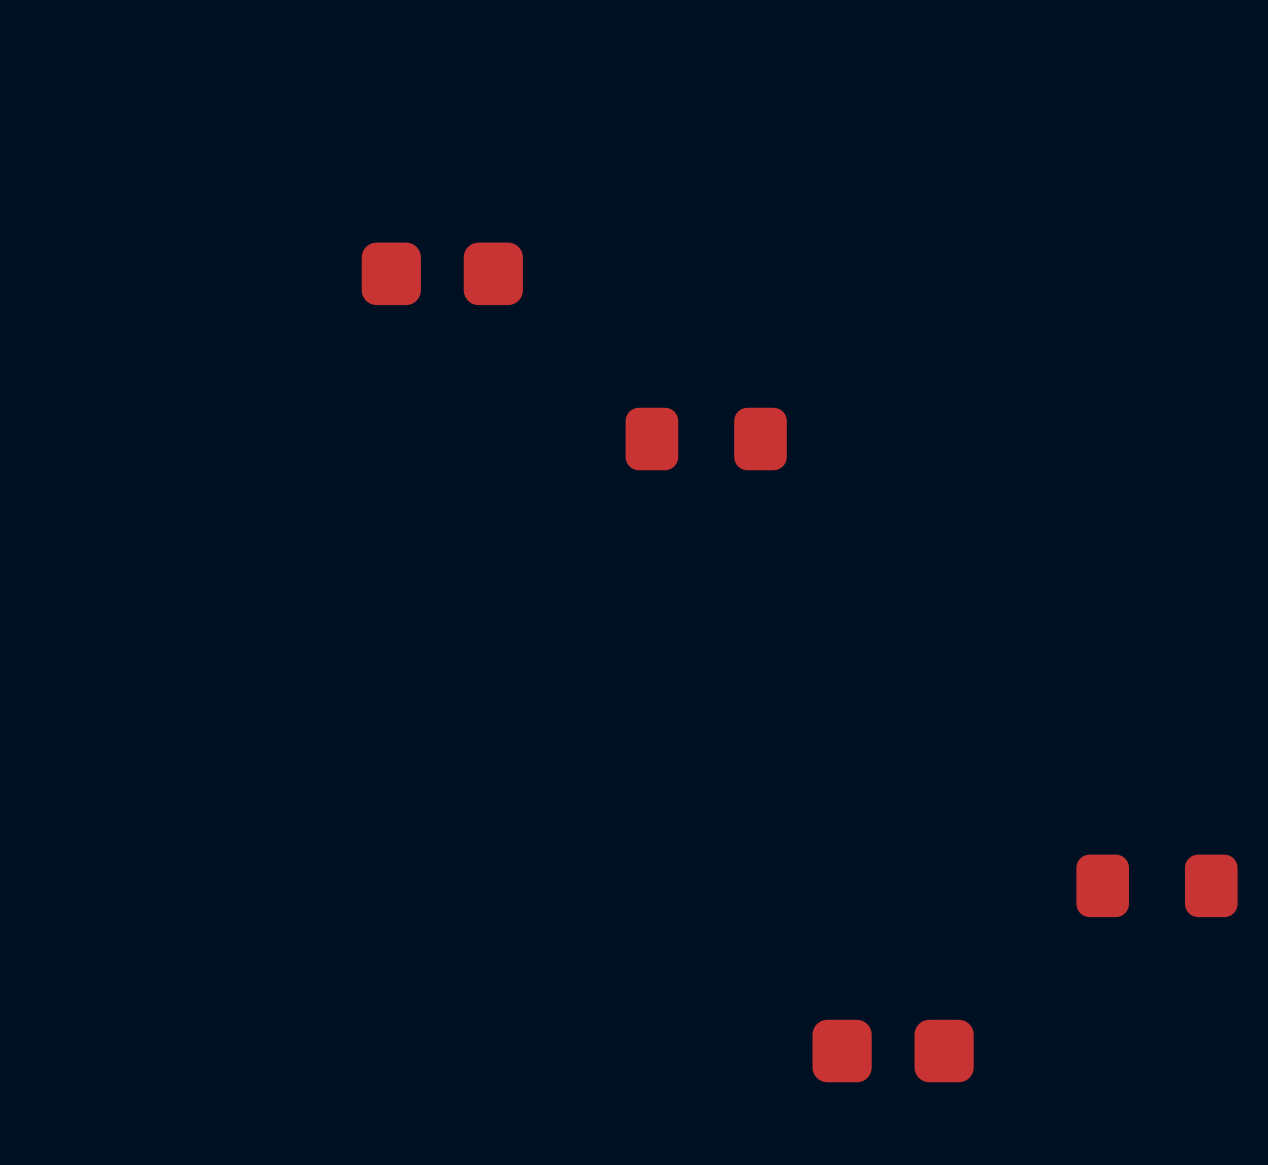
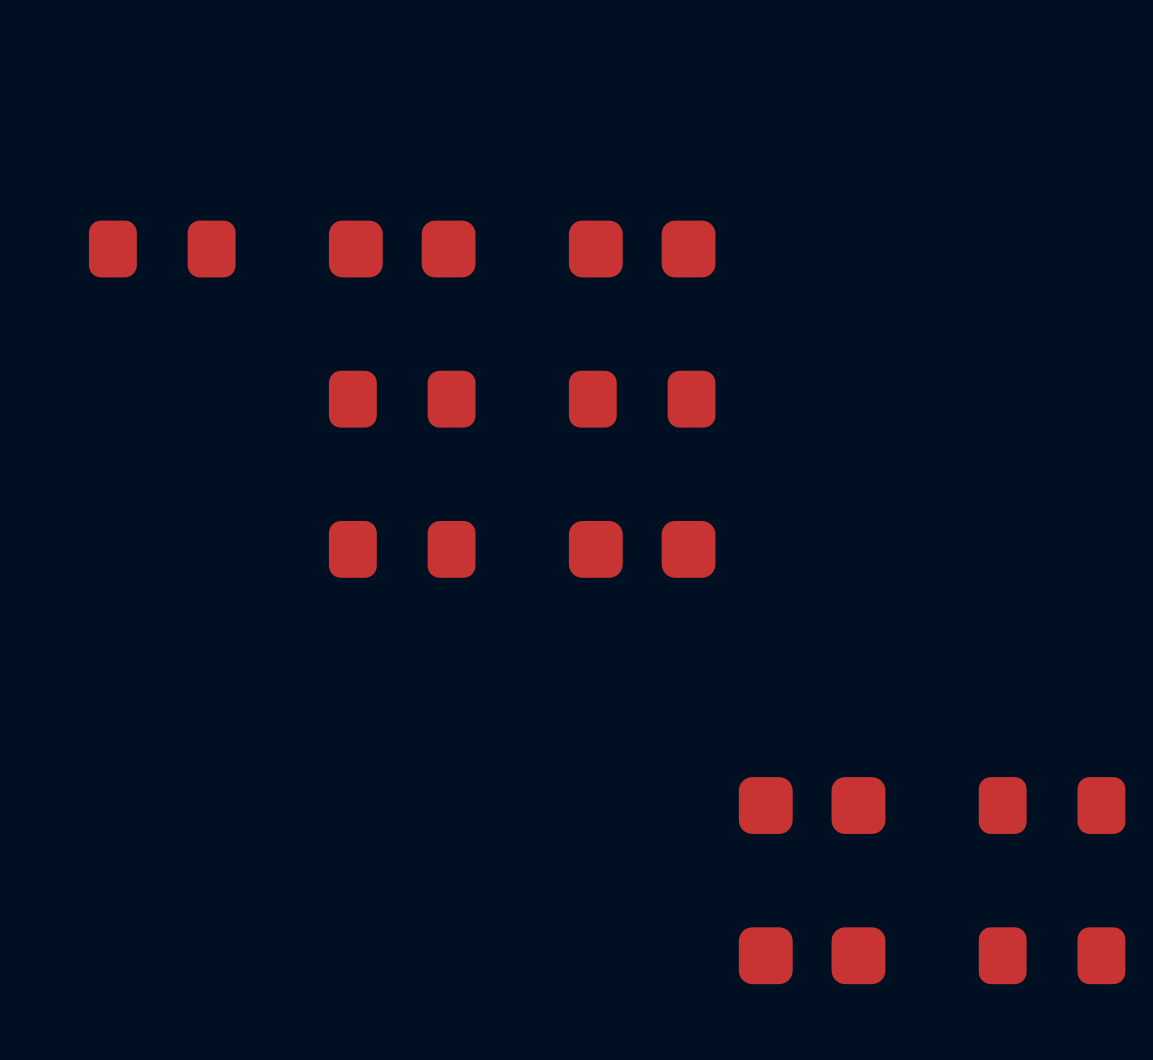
part: none -> (162, 249)
part: none -> (642, 249)
part: none -> (402, 399)
part: none -> (402, 549)
part: none -> (642, 549)
part: none -> (812, 805)
part: none -> (1052, 955)

